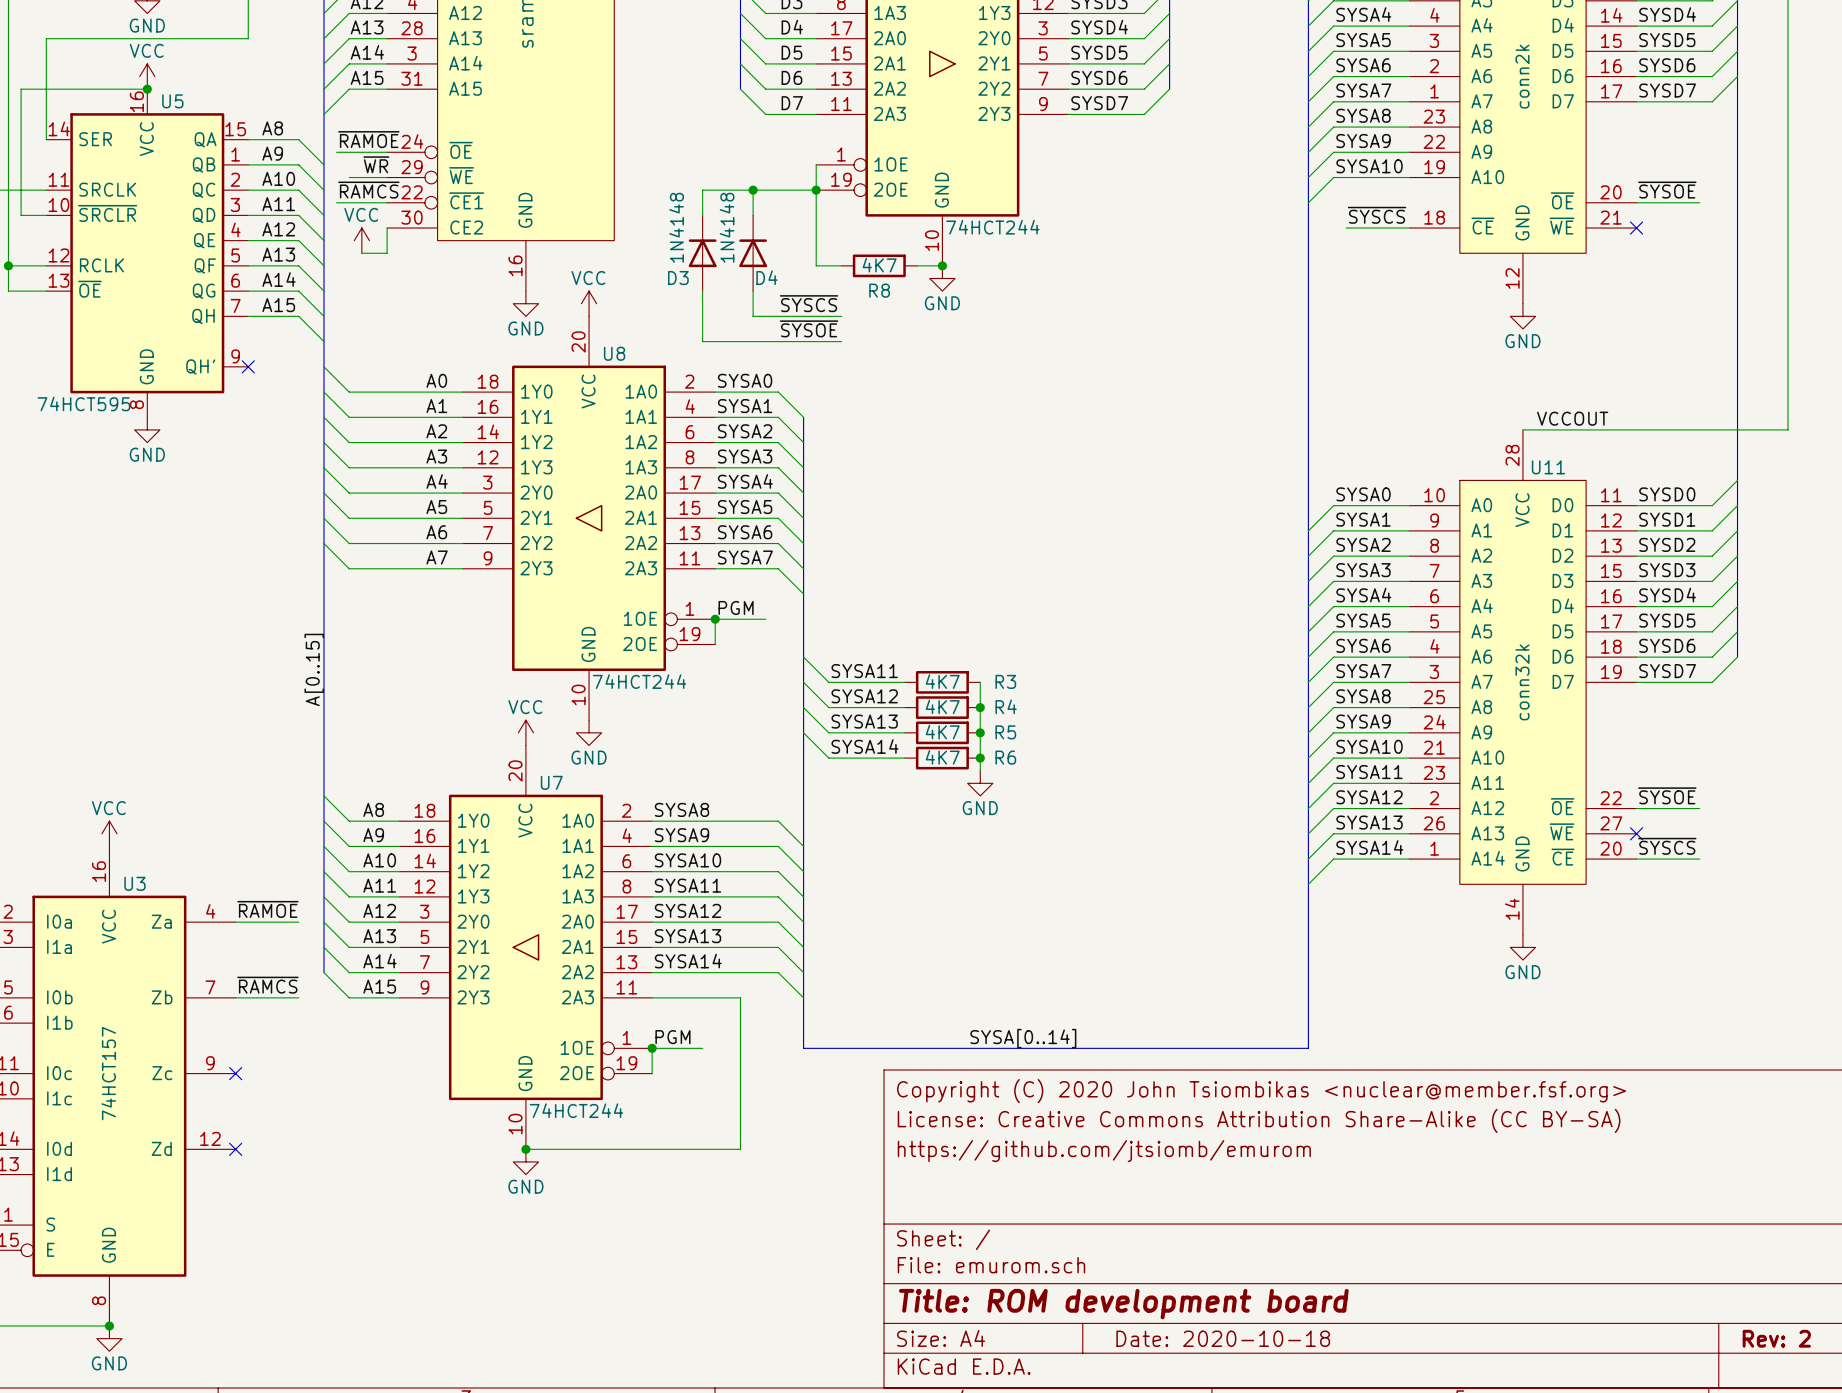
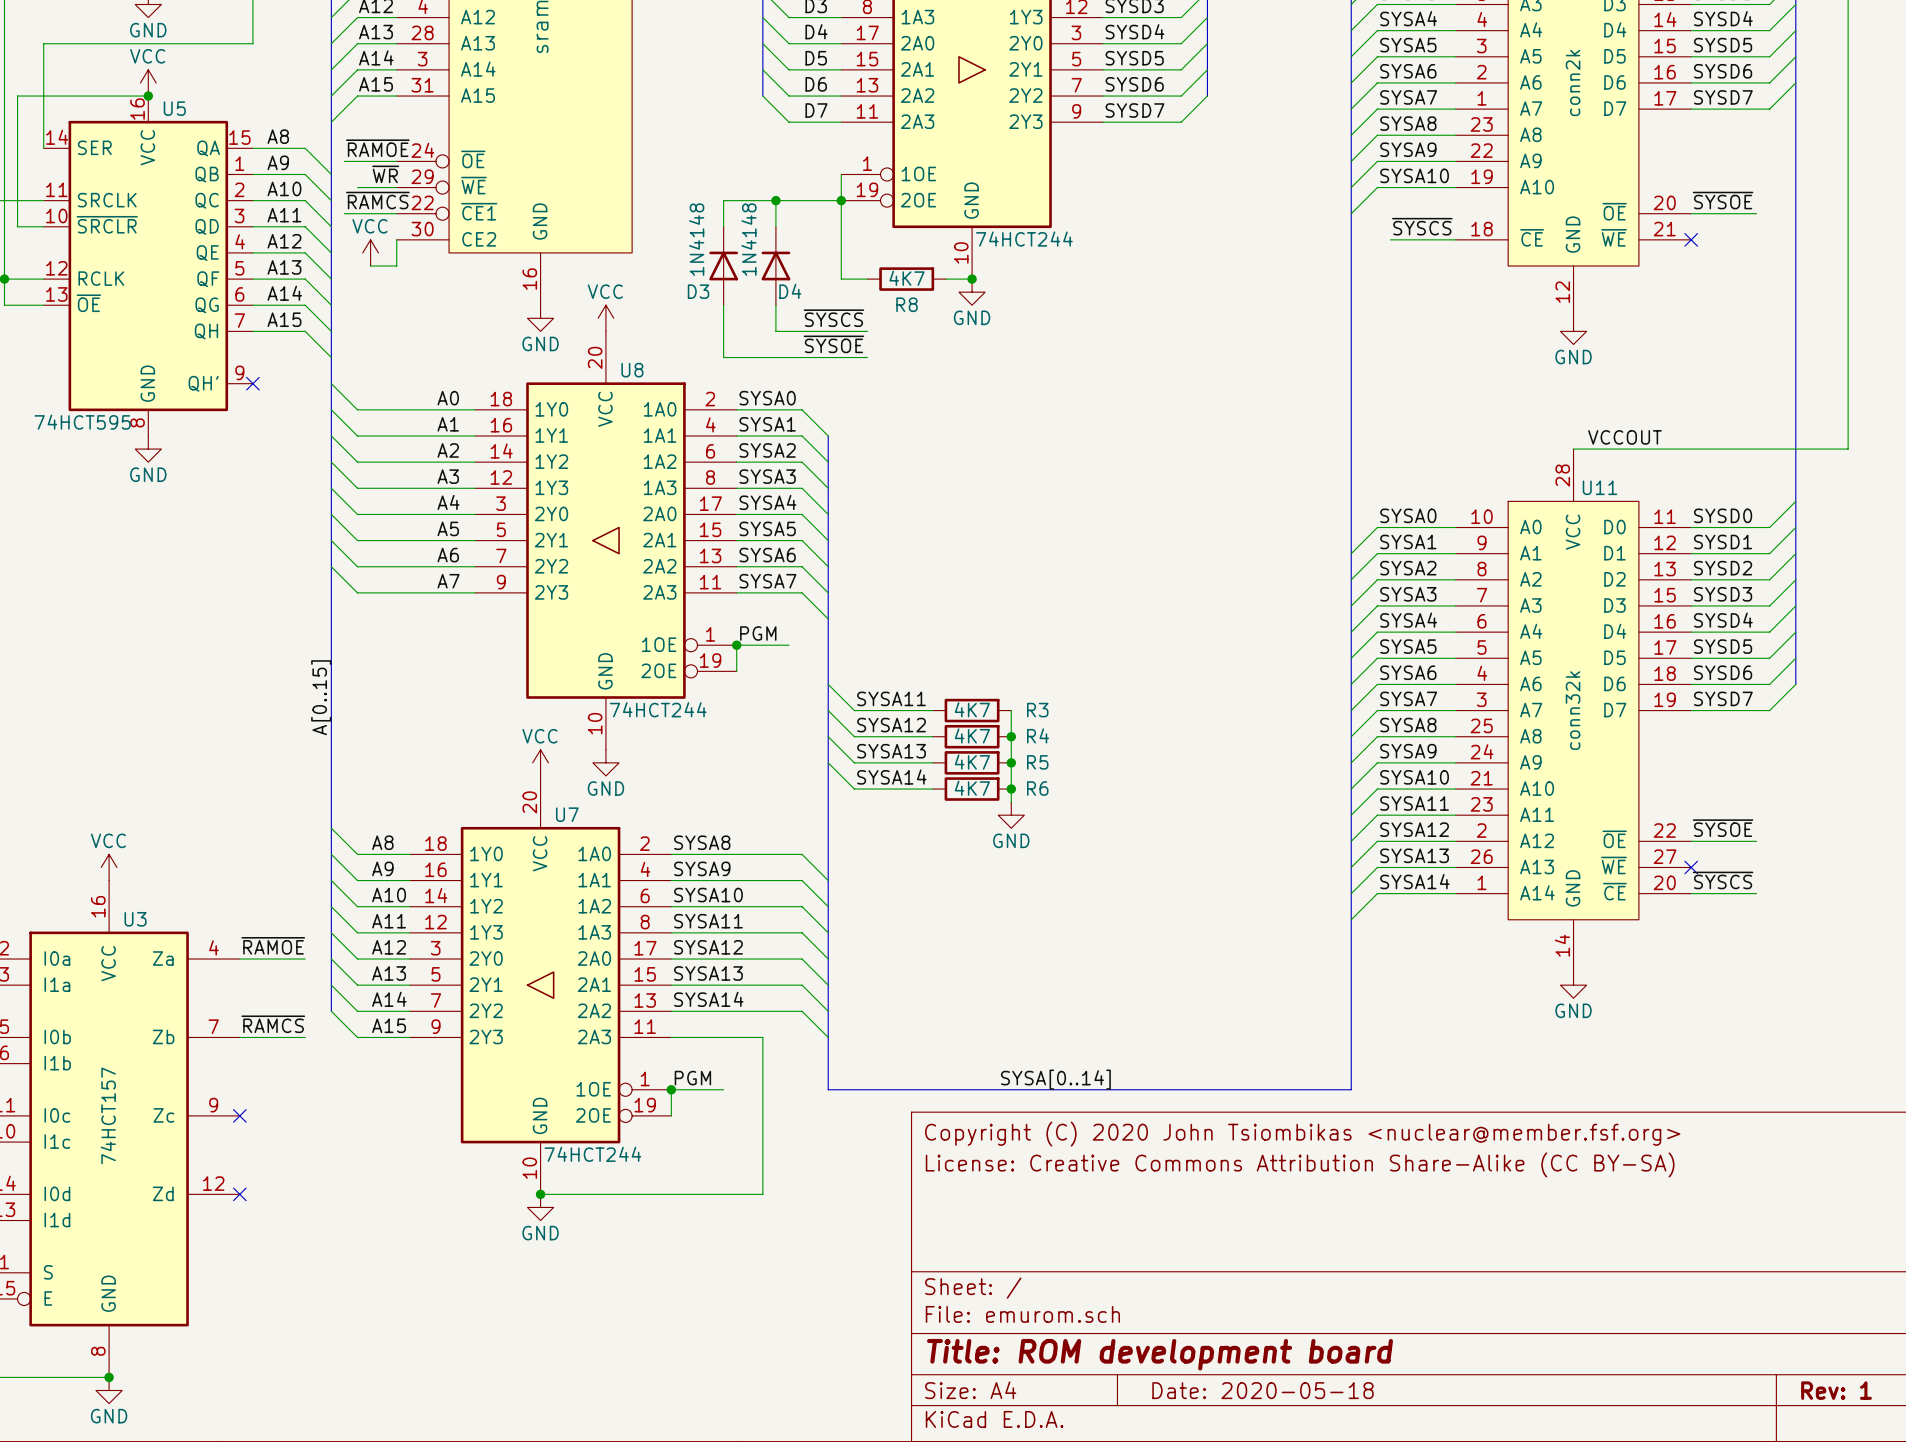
title block: https://github.com/jtsiomb/emurom (1104, 1151) -> none
title block: Date: 2020-10-18 (1223, 1338) -> Date: 2020-05-18 (1263, 1390)
title block: Rev: 2 (1776, 1338) -> Rev: 1 (1836, 1390)

